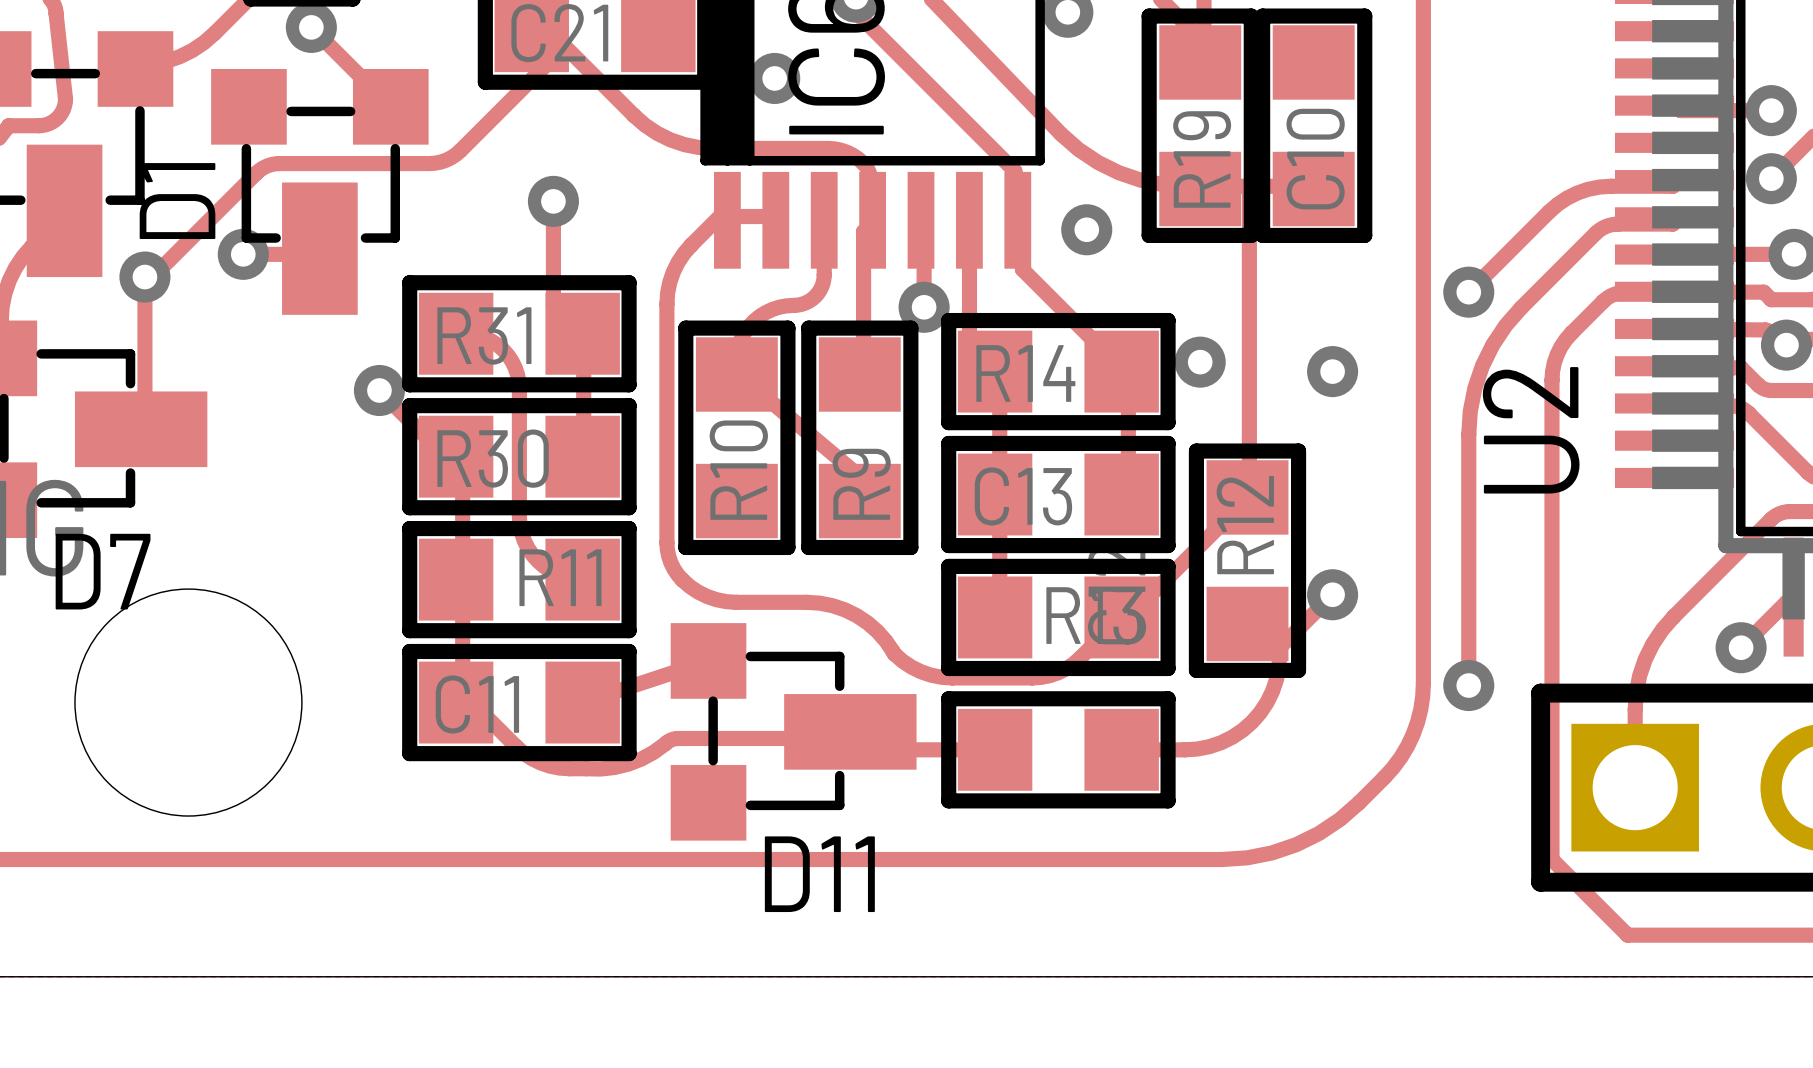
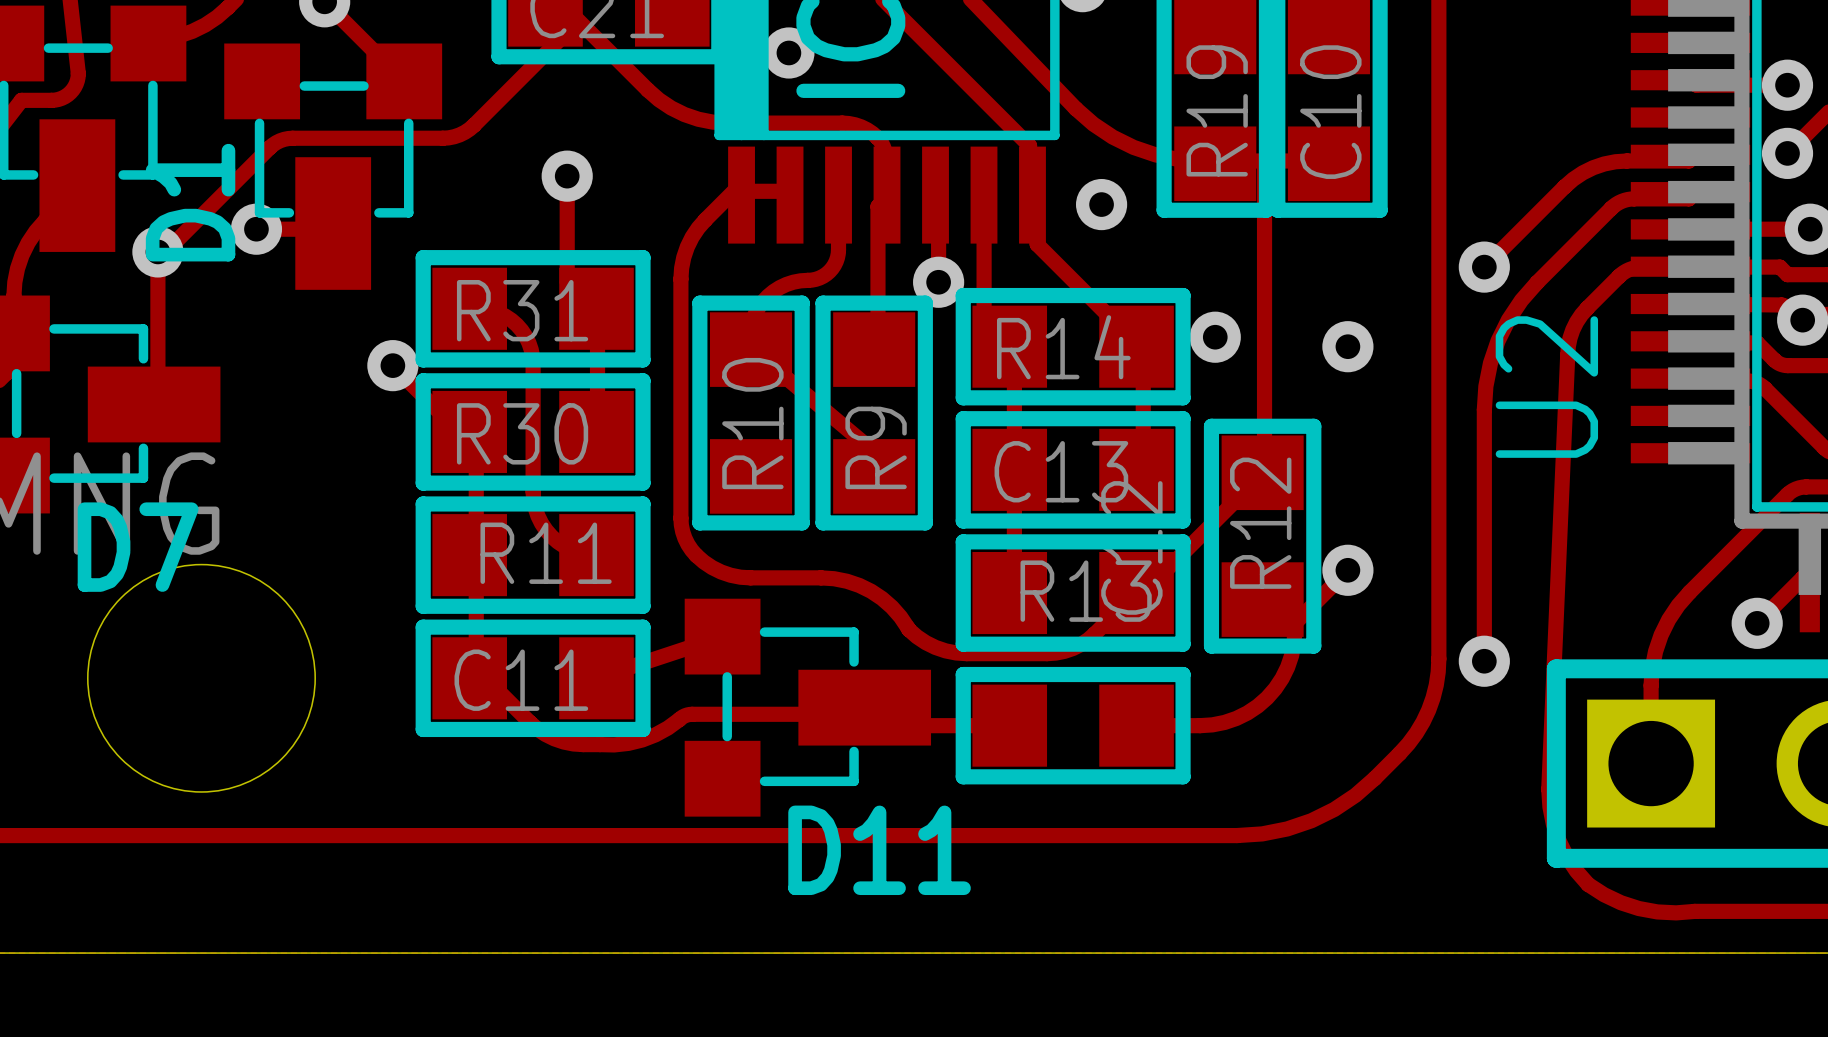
track: (1551, 380) (1551, 859) (1627, 935) (1678, 935) -> (1567, 355) (1548, 789) (1553, 824) (1566, 856) (1576, 871) (1588, 884) (1603, 894) (1620, 902) (1657, 911) (1694, 911)

